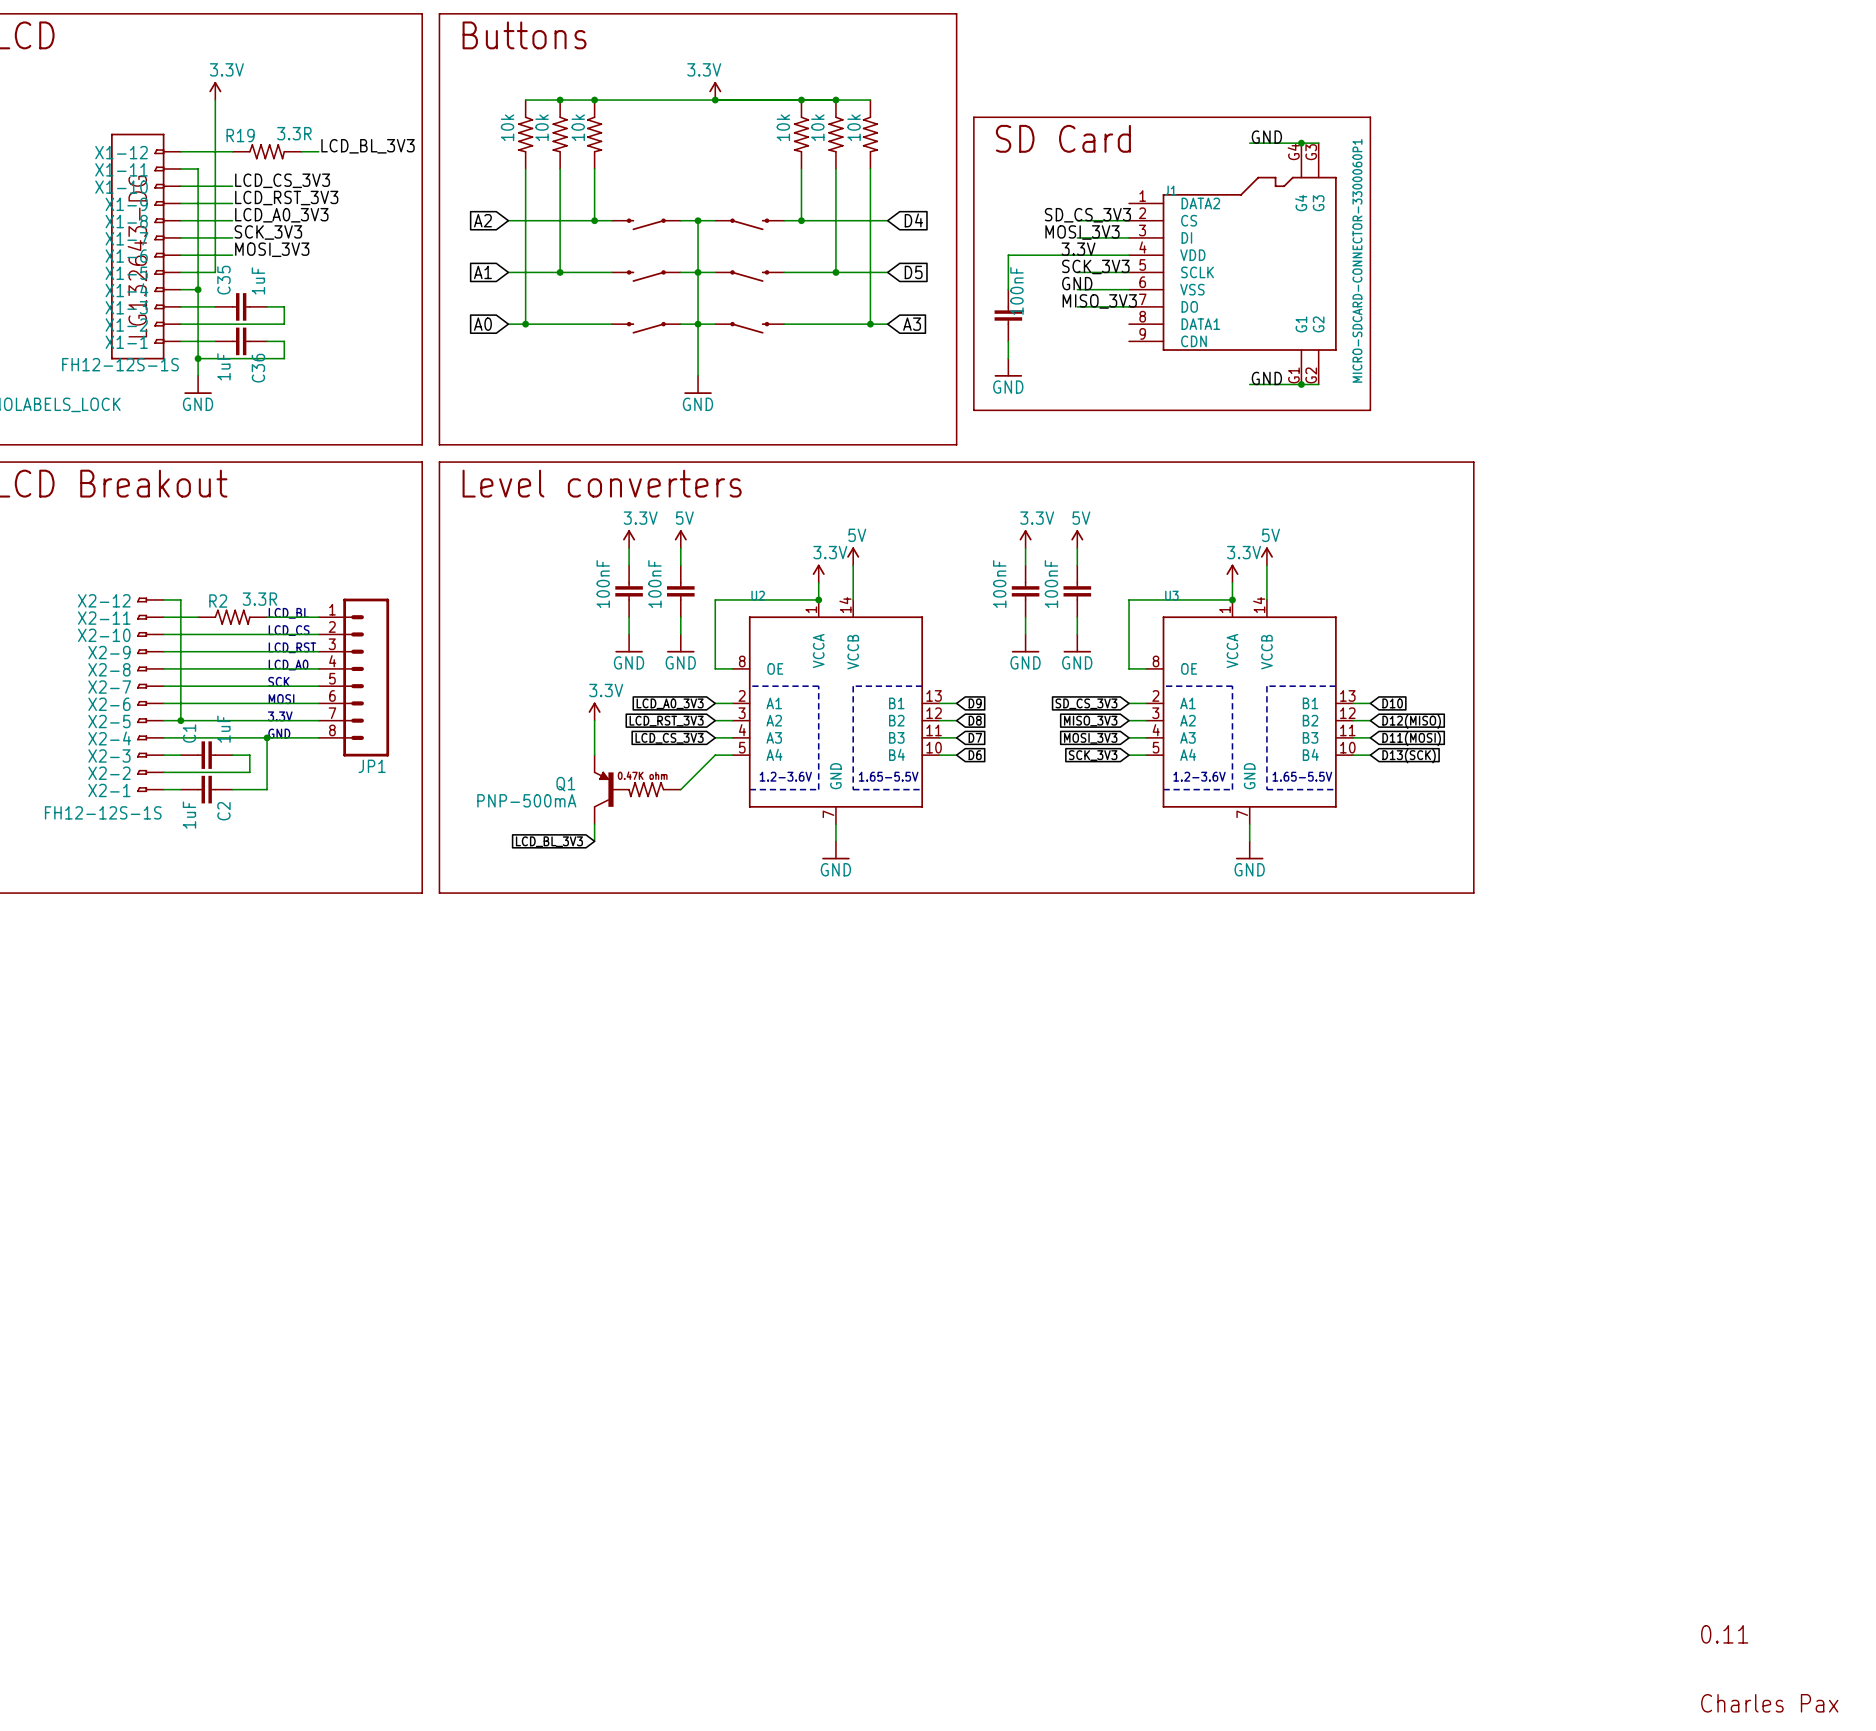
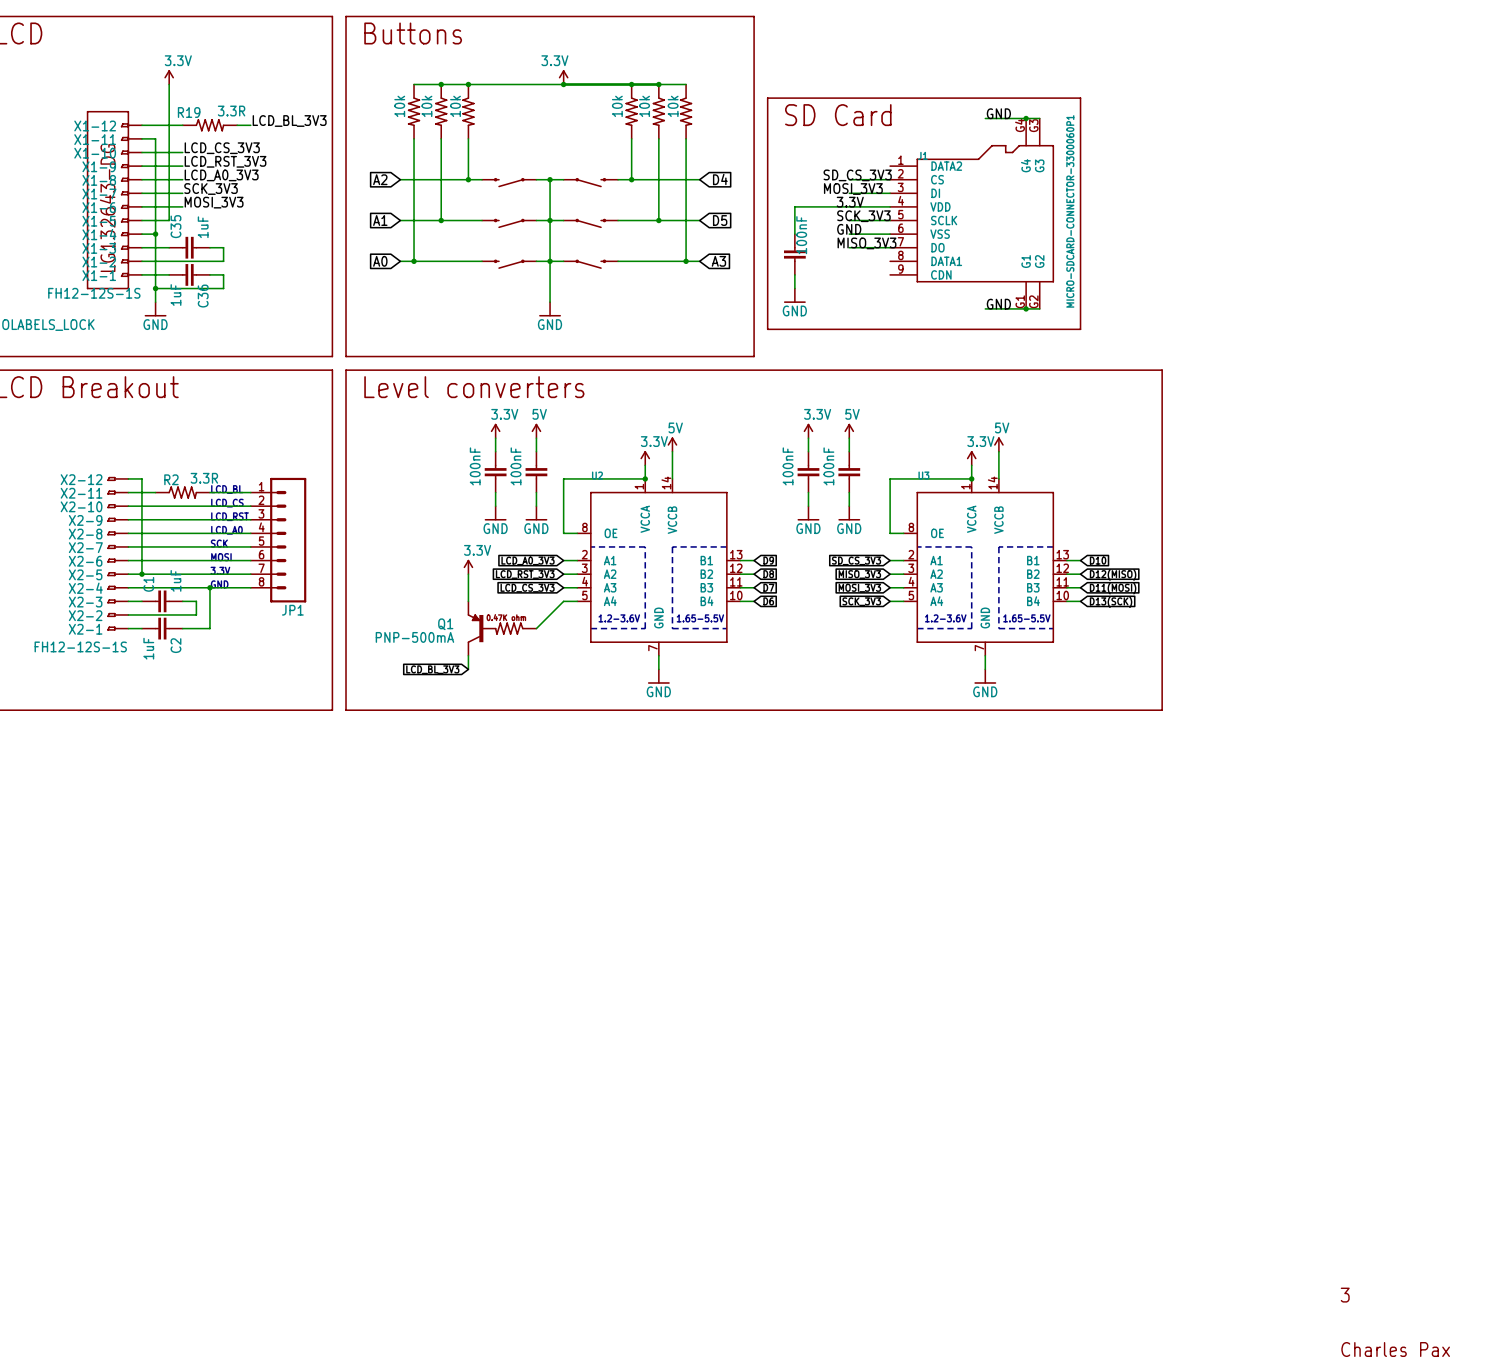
text: 0.11 (1724, 1634) -> 3 (1345, 1295)

